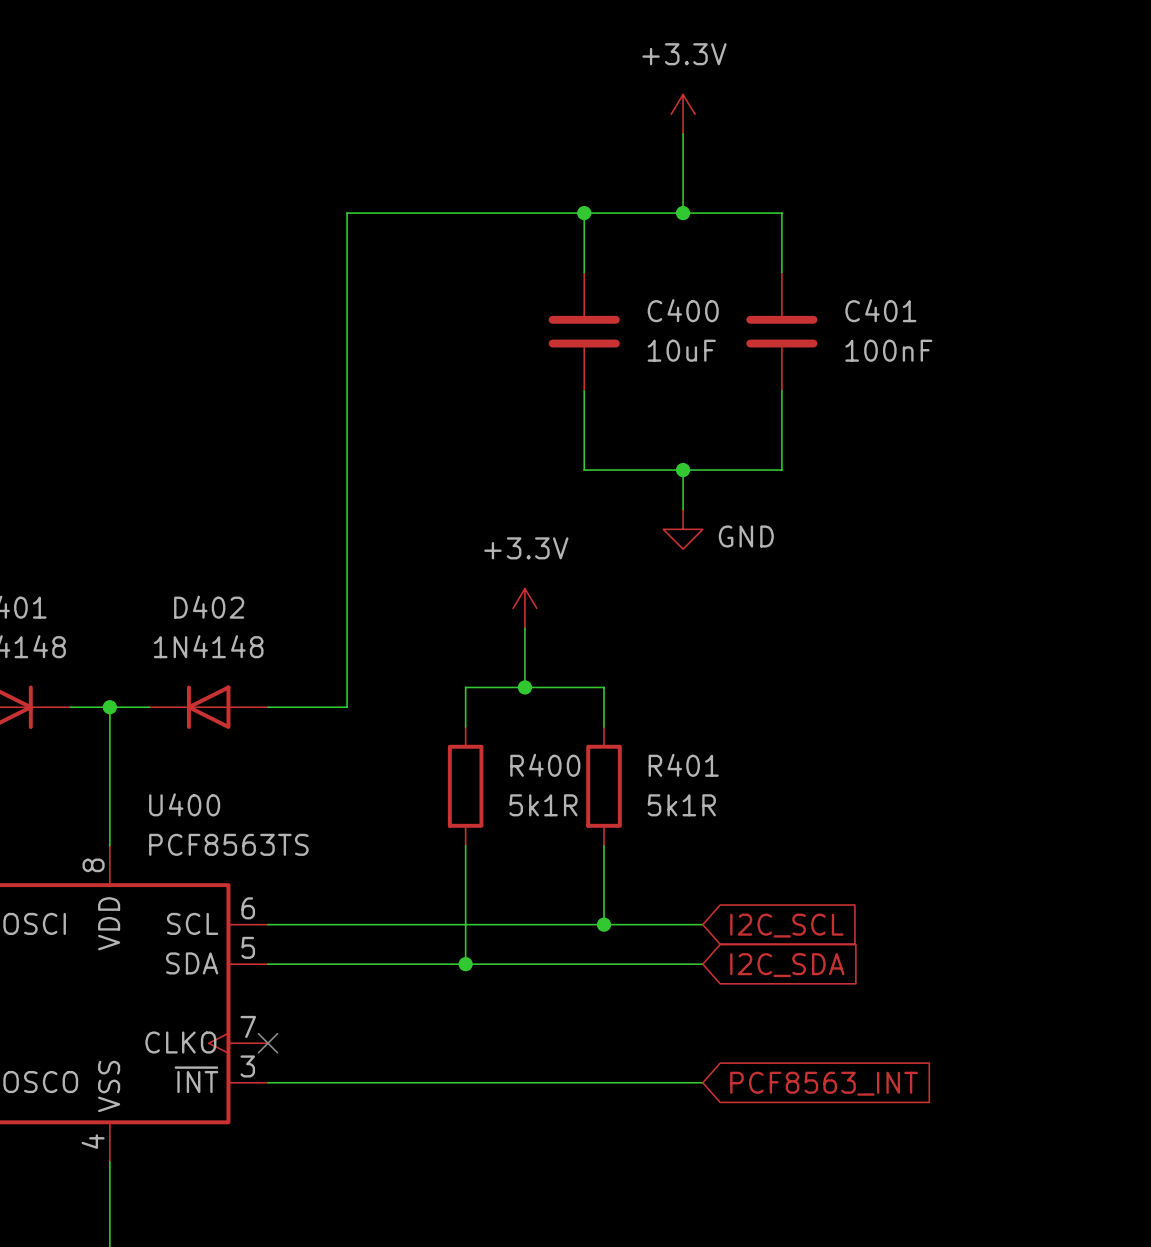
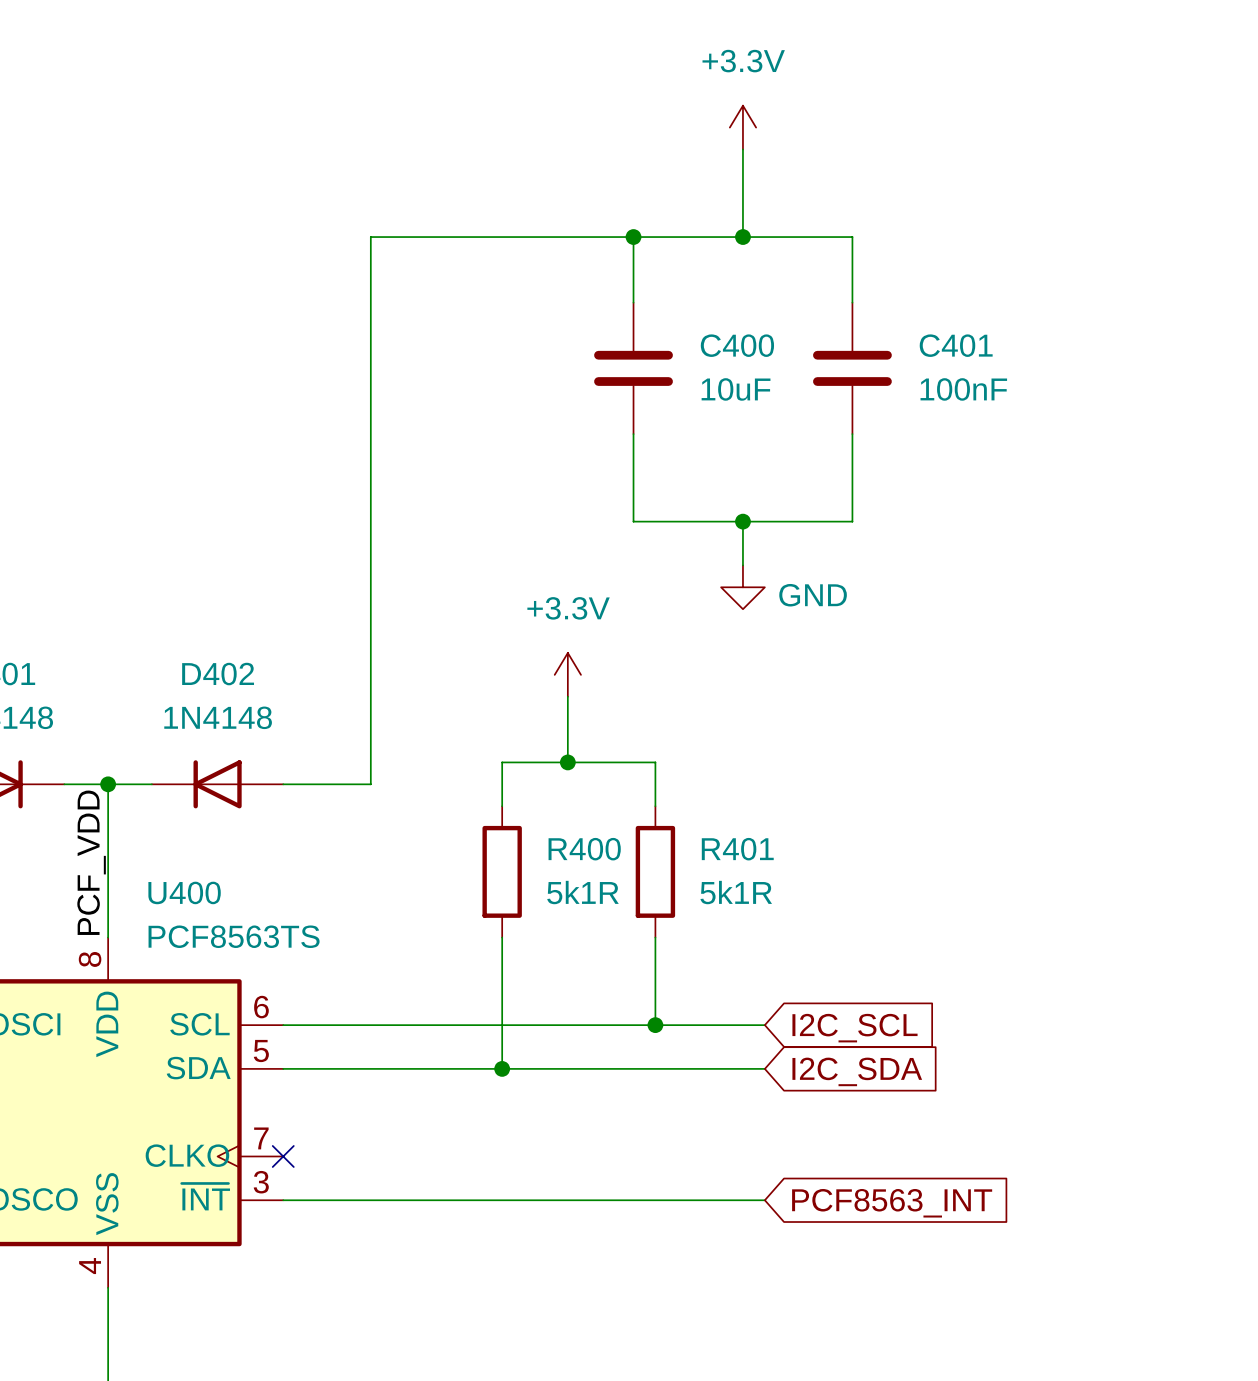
label: none -> PCF_VDD (91, 862)

